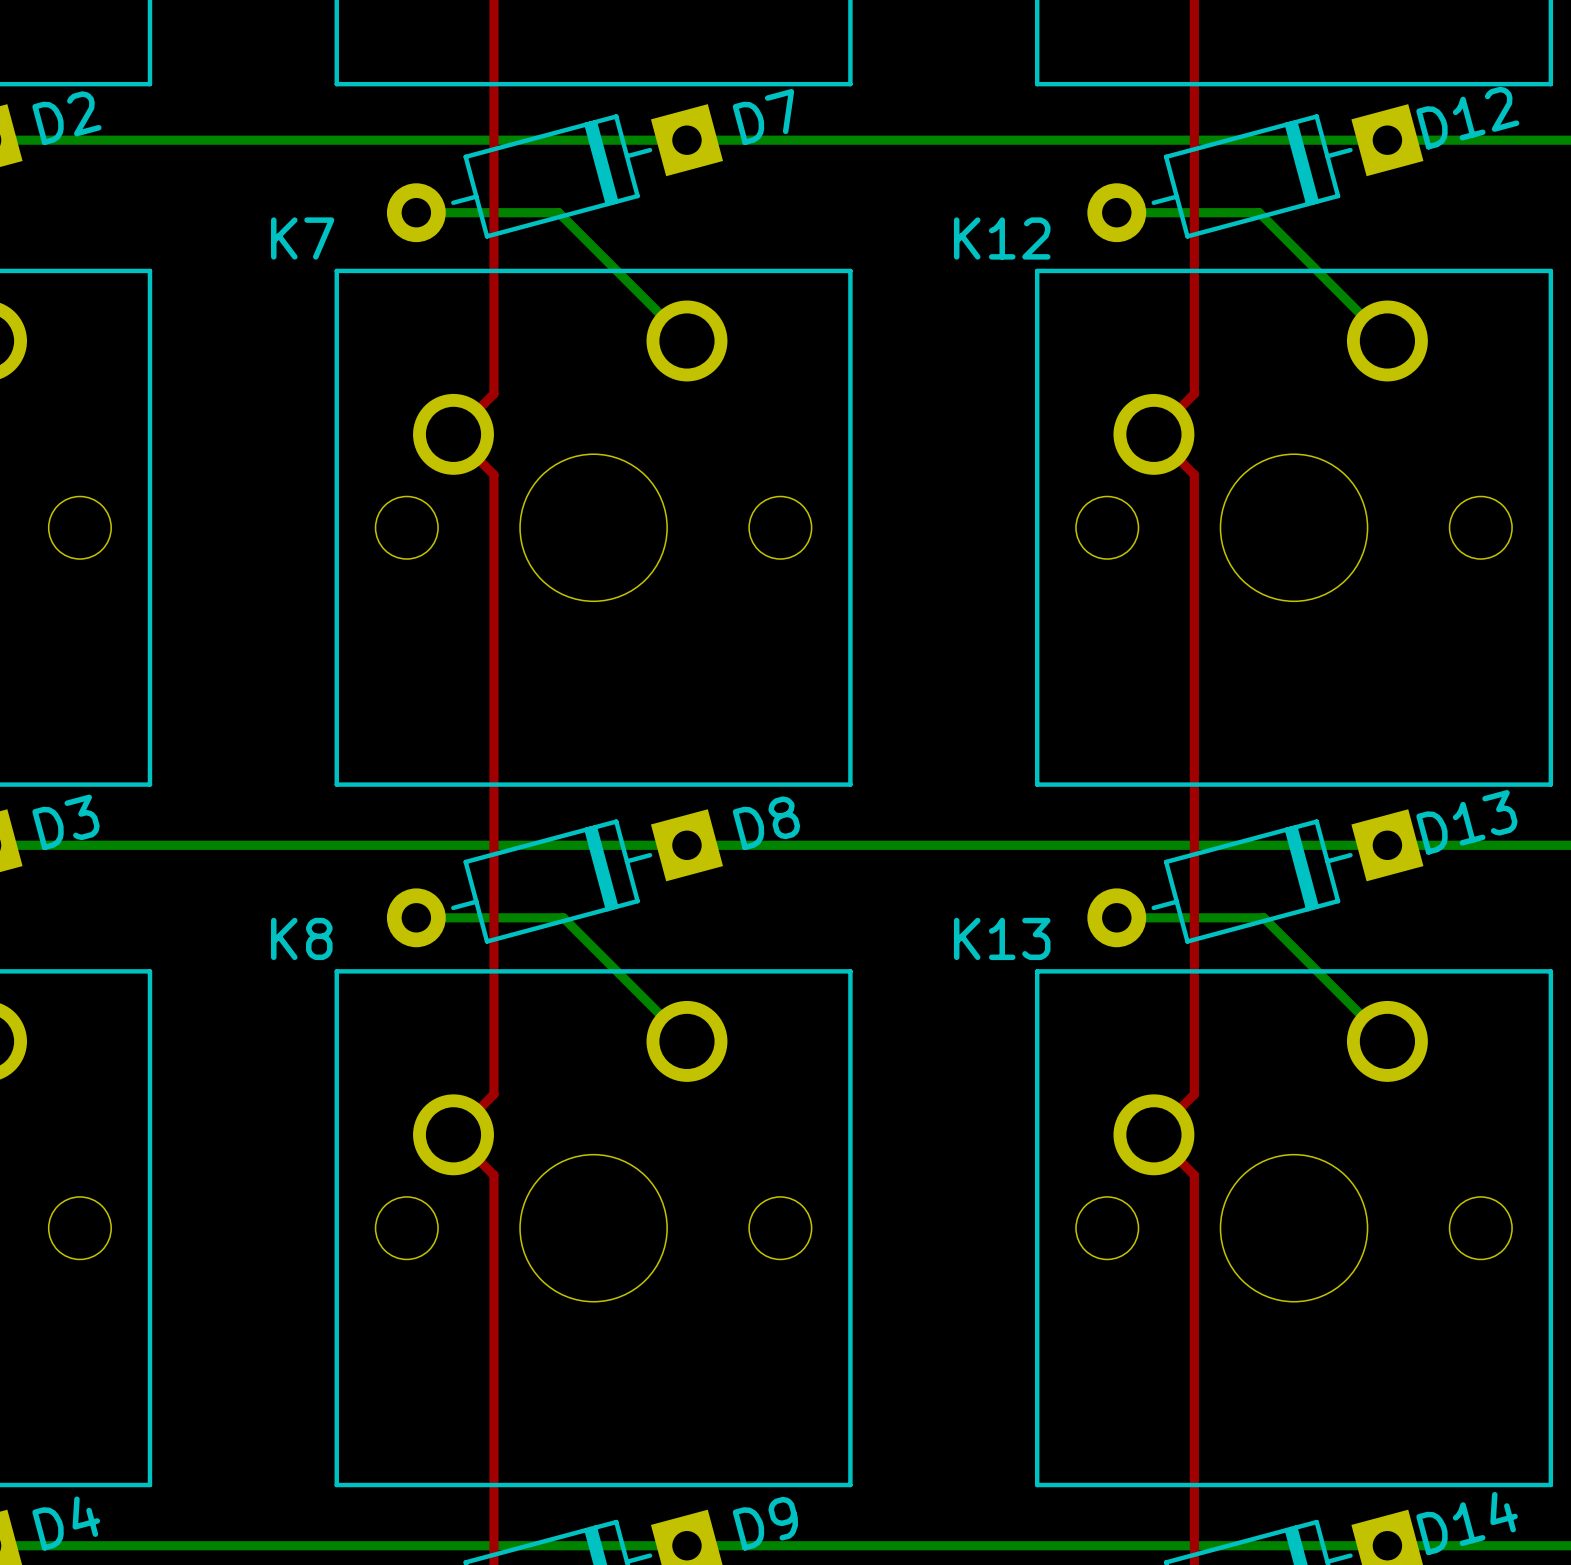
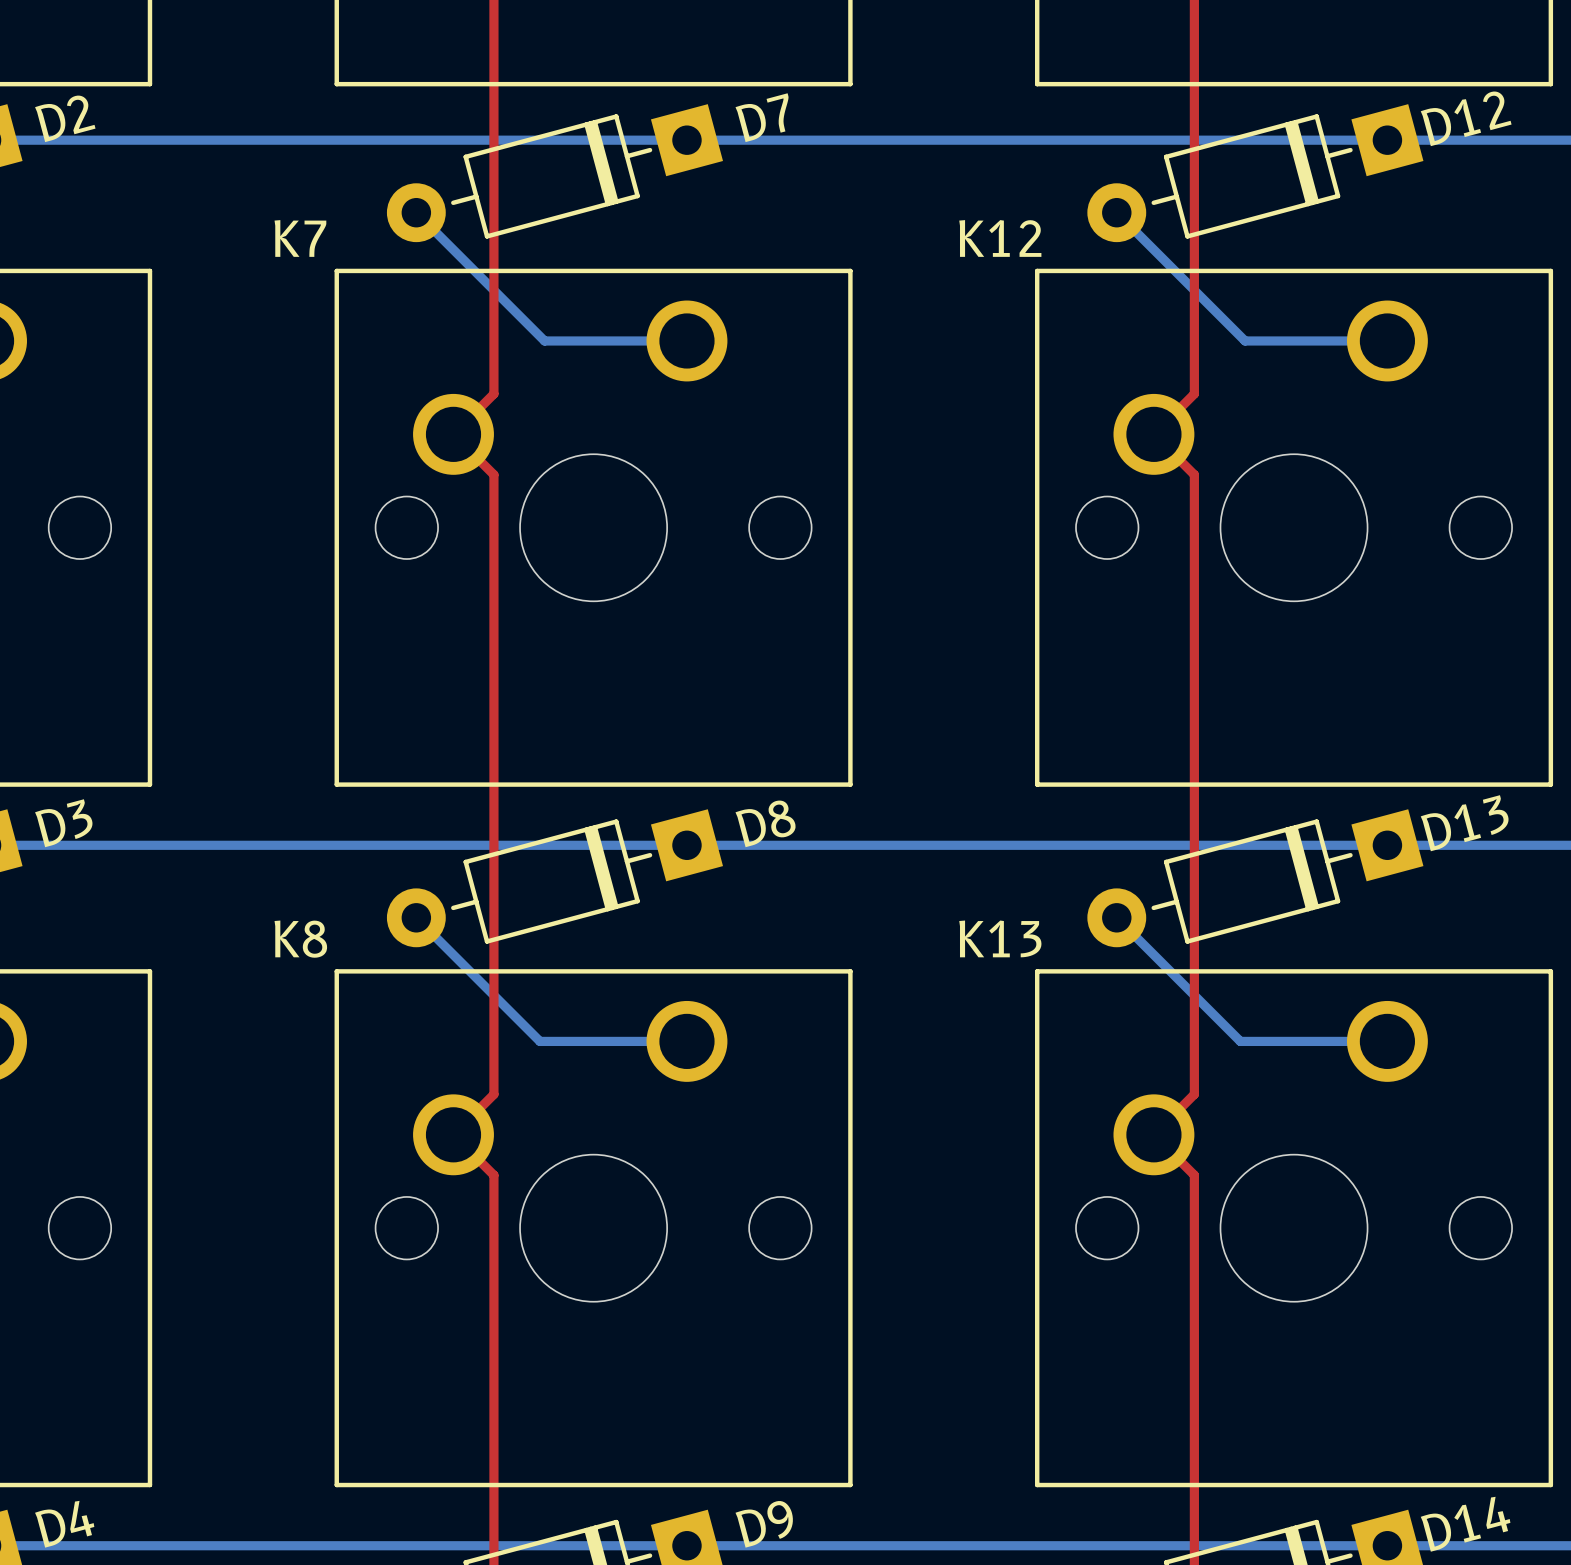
bottom track: (416, 212) (558, 212) (686, 340) -> (416, 212) (544, 340) (686, 340)
bottom track: (1116, 212) (1259, 212) (1387, 340) -> (1116, 212) (1245, 340) (1387, 340)
bottom track: (416, 917) (563, 917) (686, 1041) -> (416, 917) (539, 1041) (686, 1041)
bottom track: (1116, 917) (1263, 917) (1387, 1041) -> (1116, 917) (1240, 1041) (1387, 1041)

